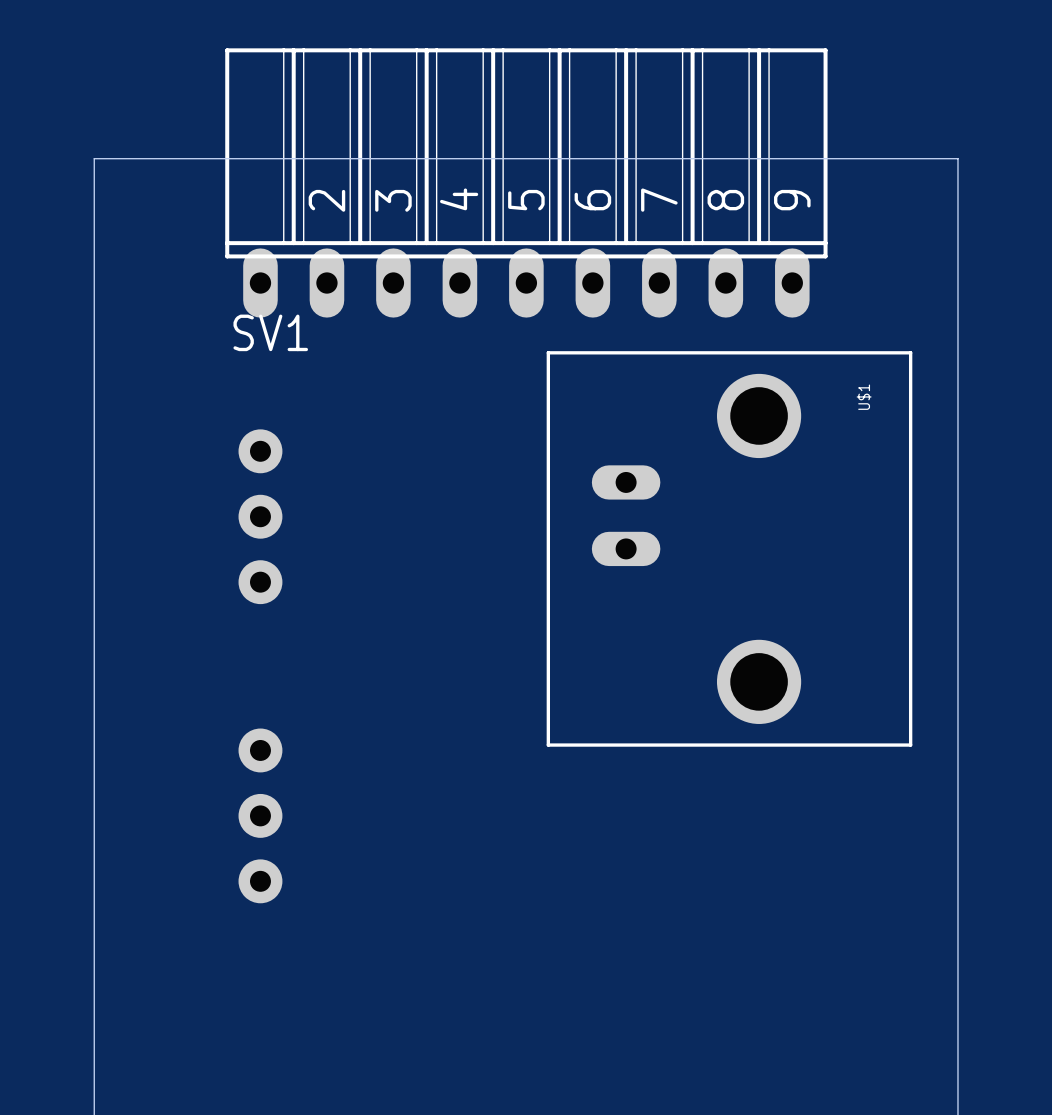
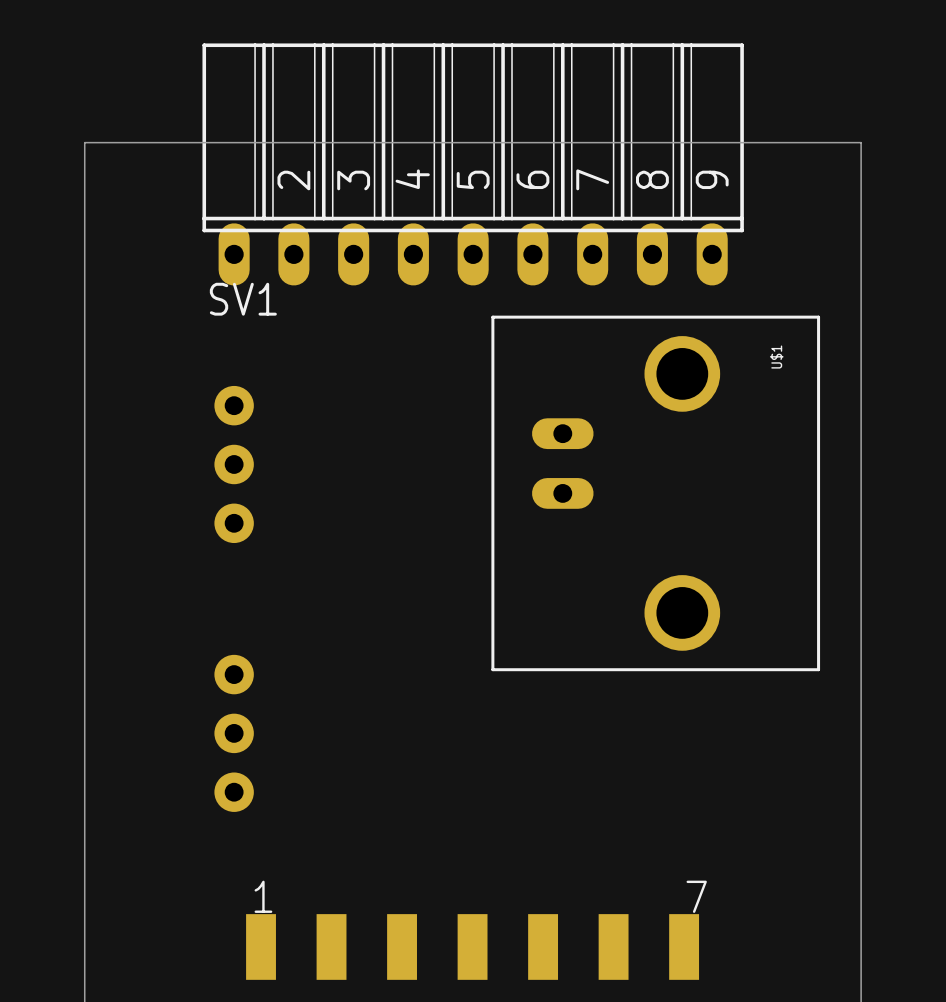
part: none -> (472, 946)

